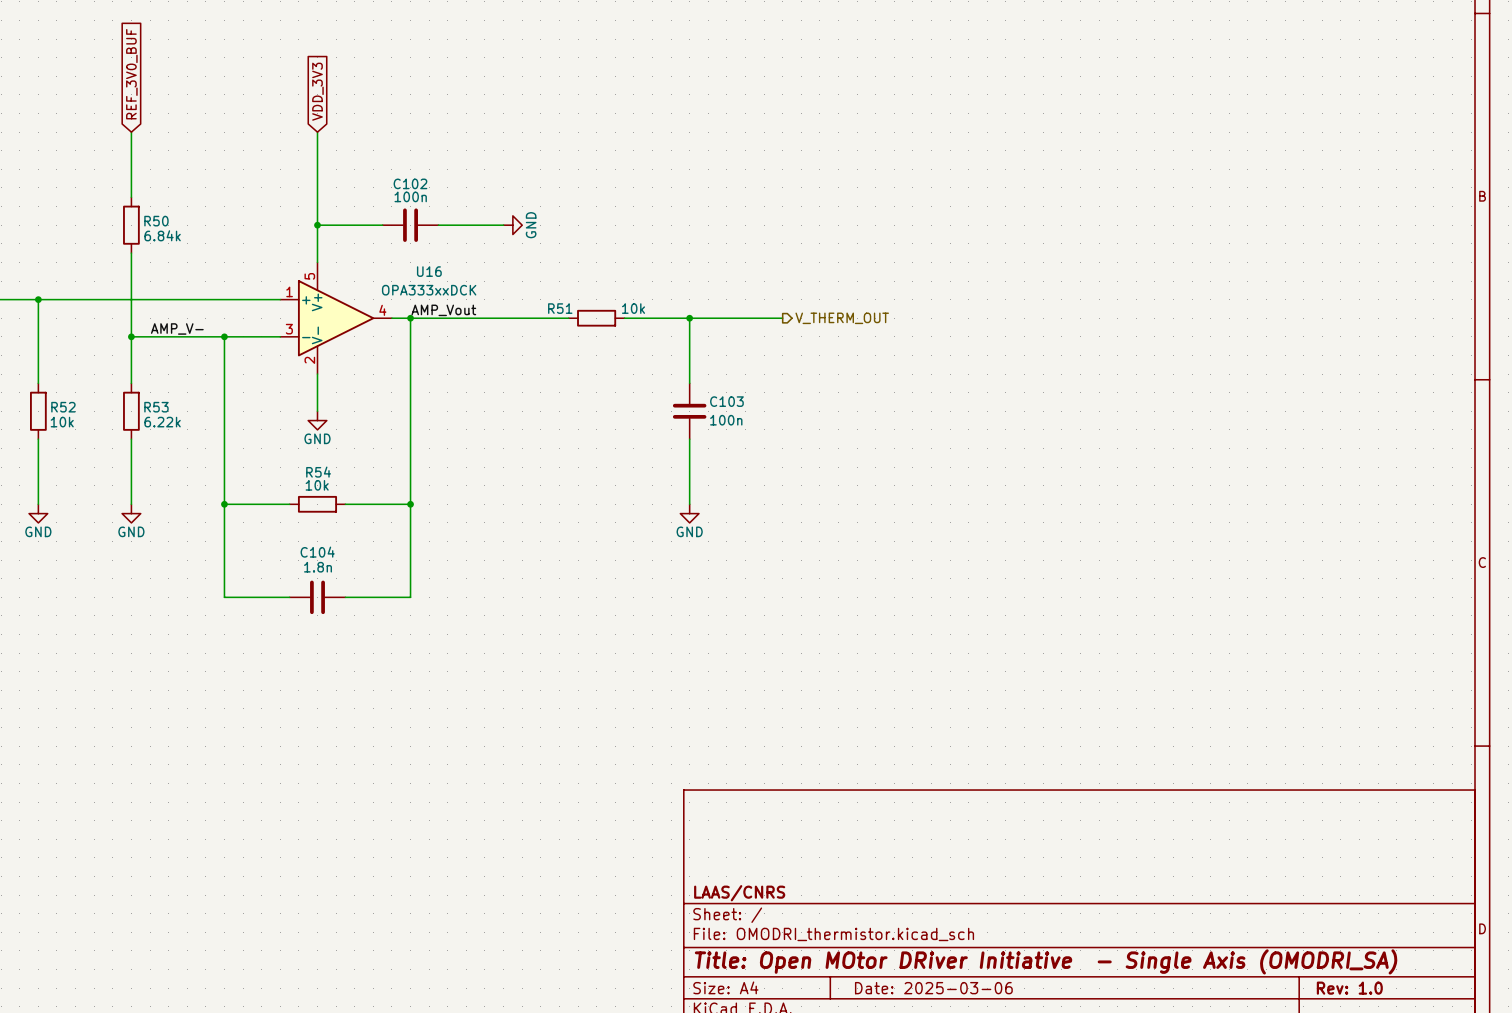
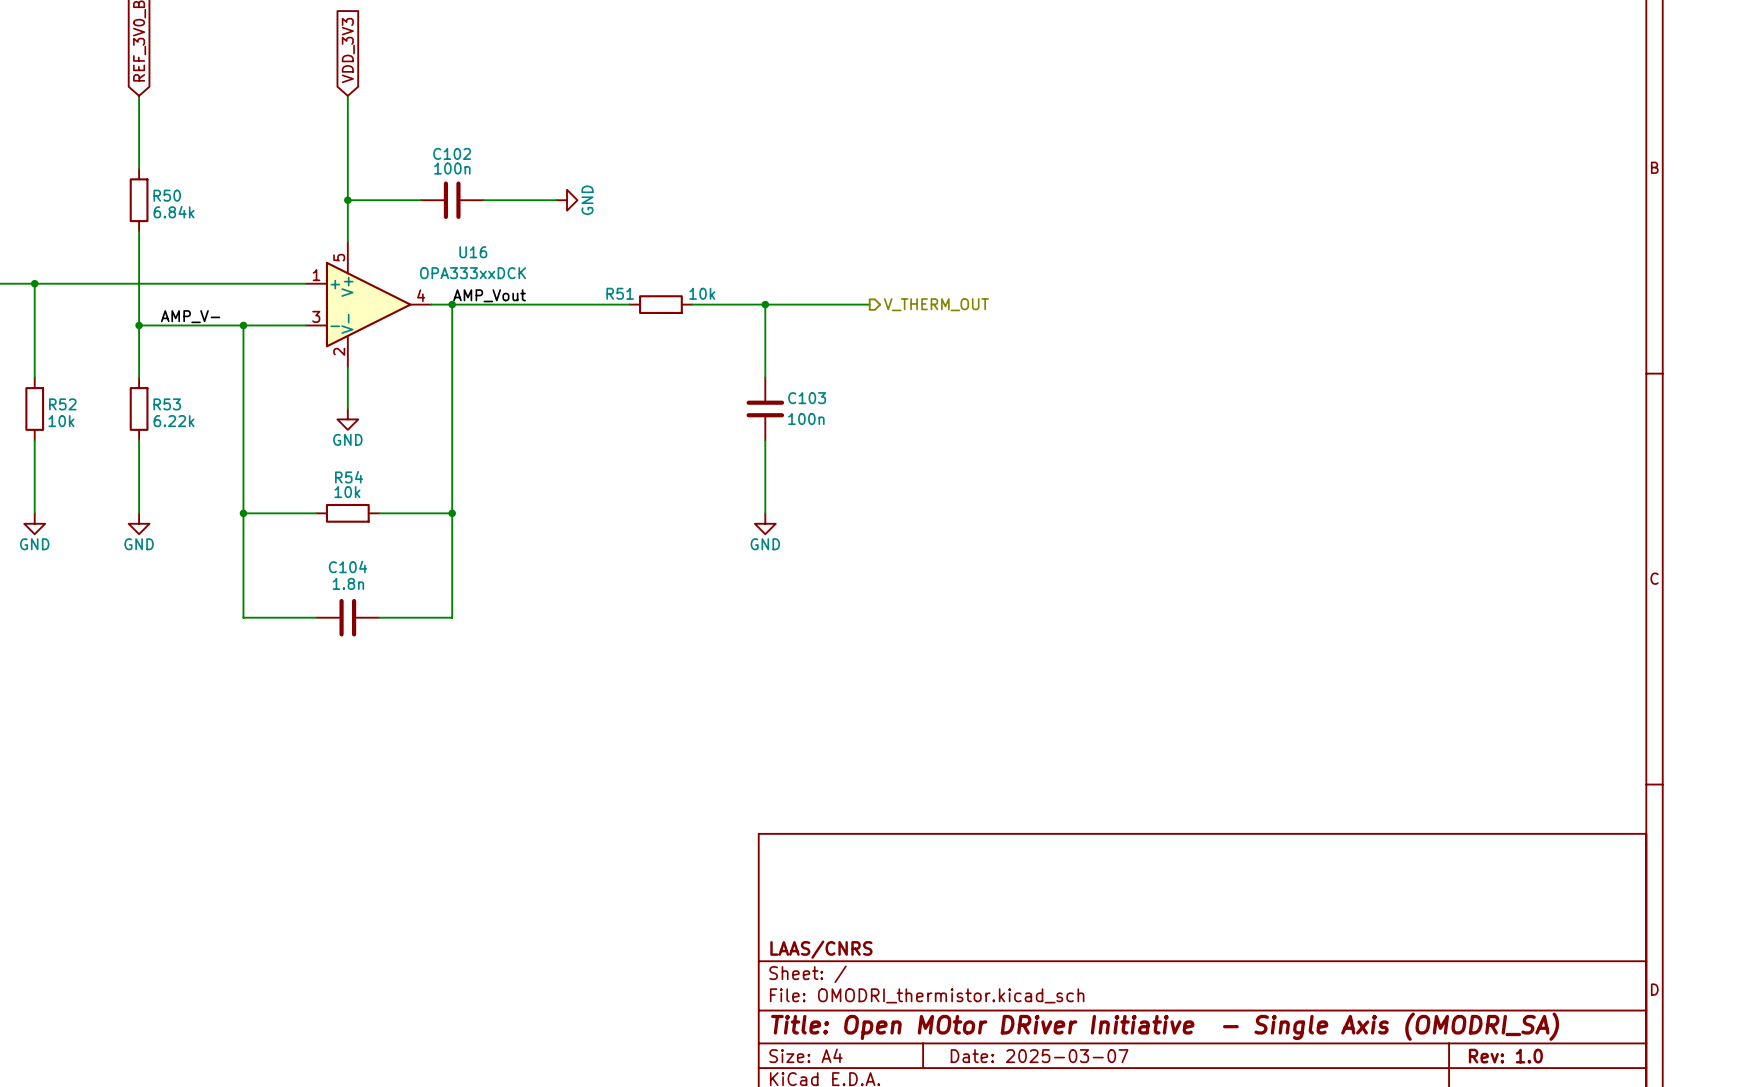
title block: Date: 2025-03-06 (933, 988) -> Date: 2025-03-07 (1039, 1056)

